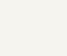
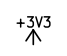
power symbol: none -> +3V3 (33, 36)

